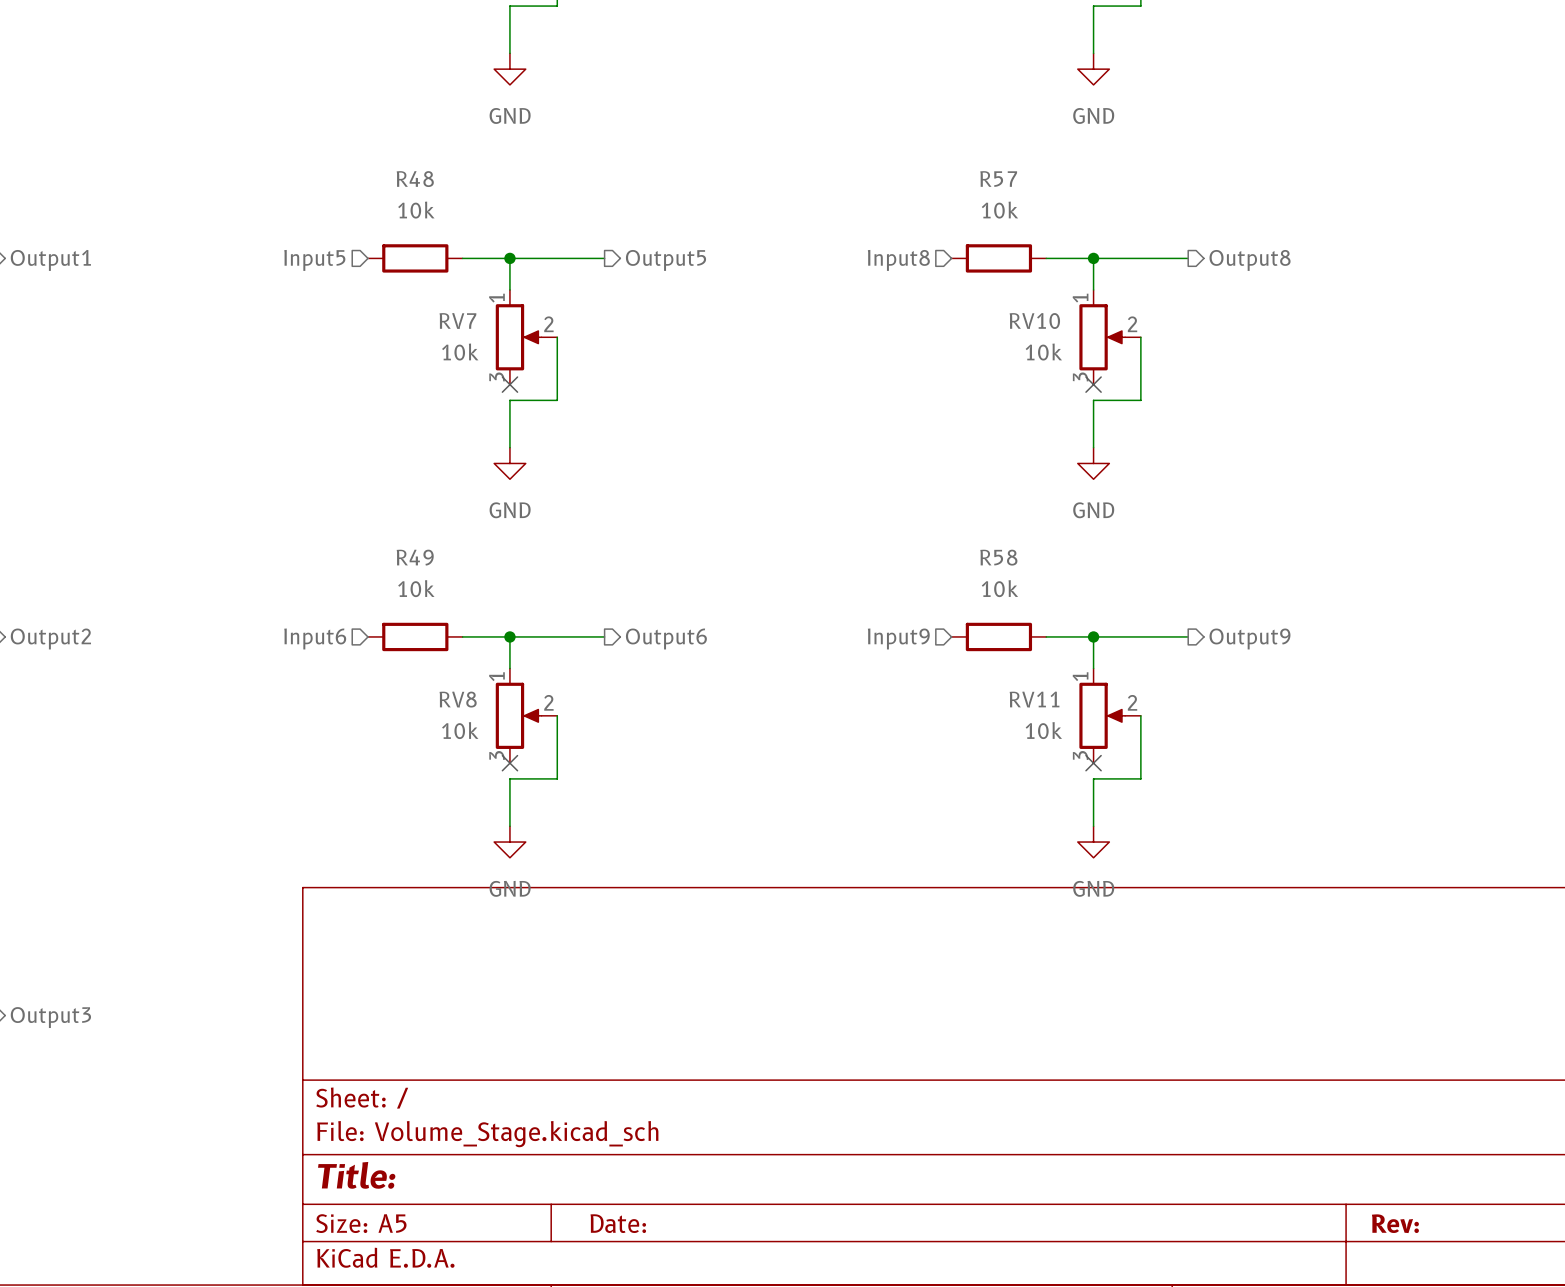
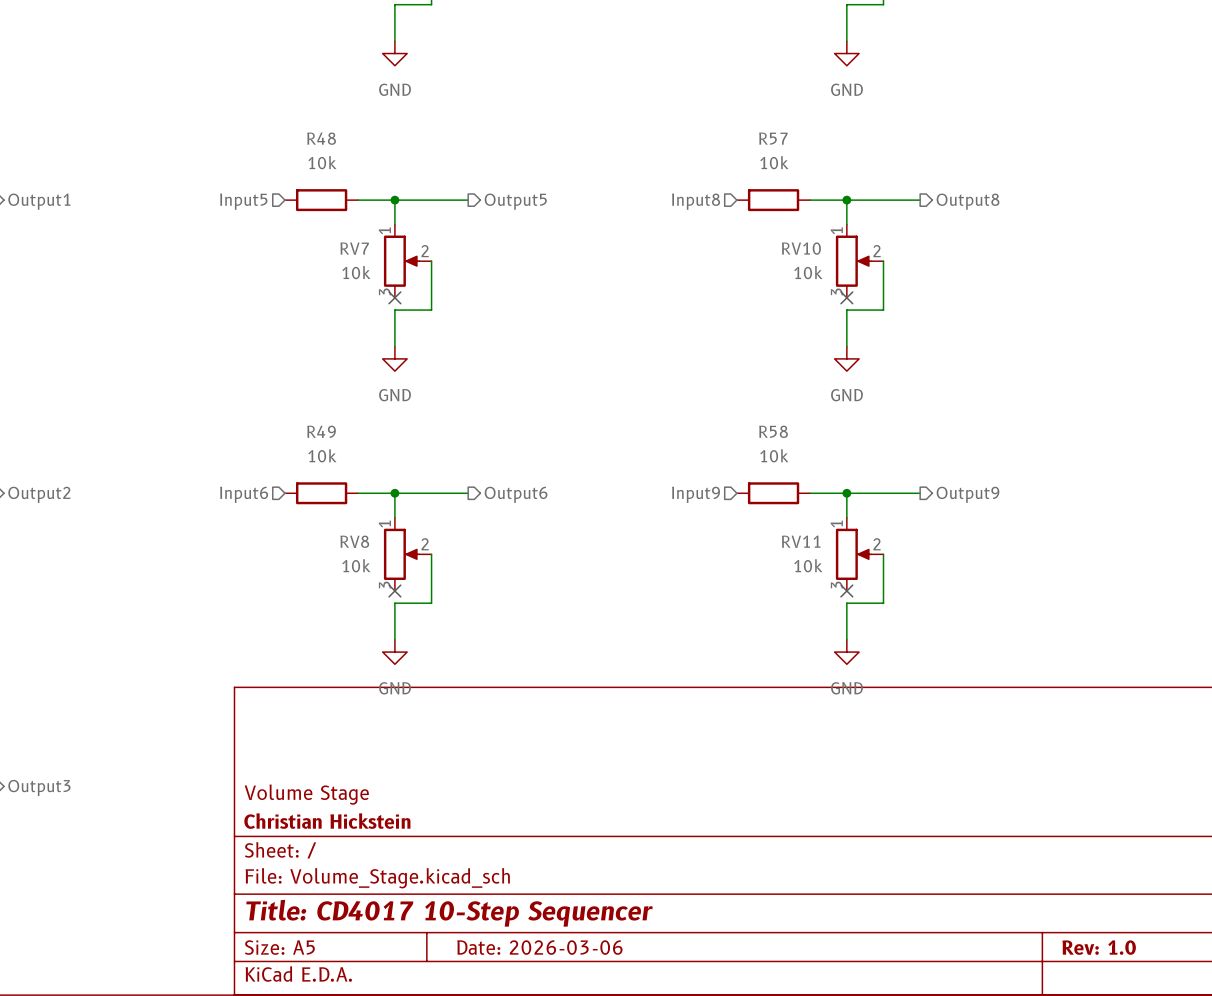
title block: none -> Volume Stage (306, 794)
title block: none -> Christian Hickstein (327, 821)
title block: Title: (356, 1175) -> Title: CD4017 10-Step Sequencer (449, 913)
title block: Date: (618, 1223) -> Date: 2026-03-06 (539, 947)
title block: Rev: (1395, 1223) -> Rev: 1.0 (1099, 947)

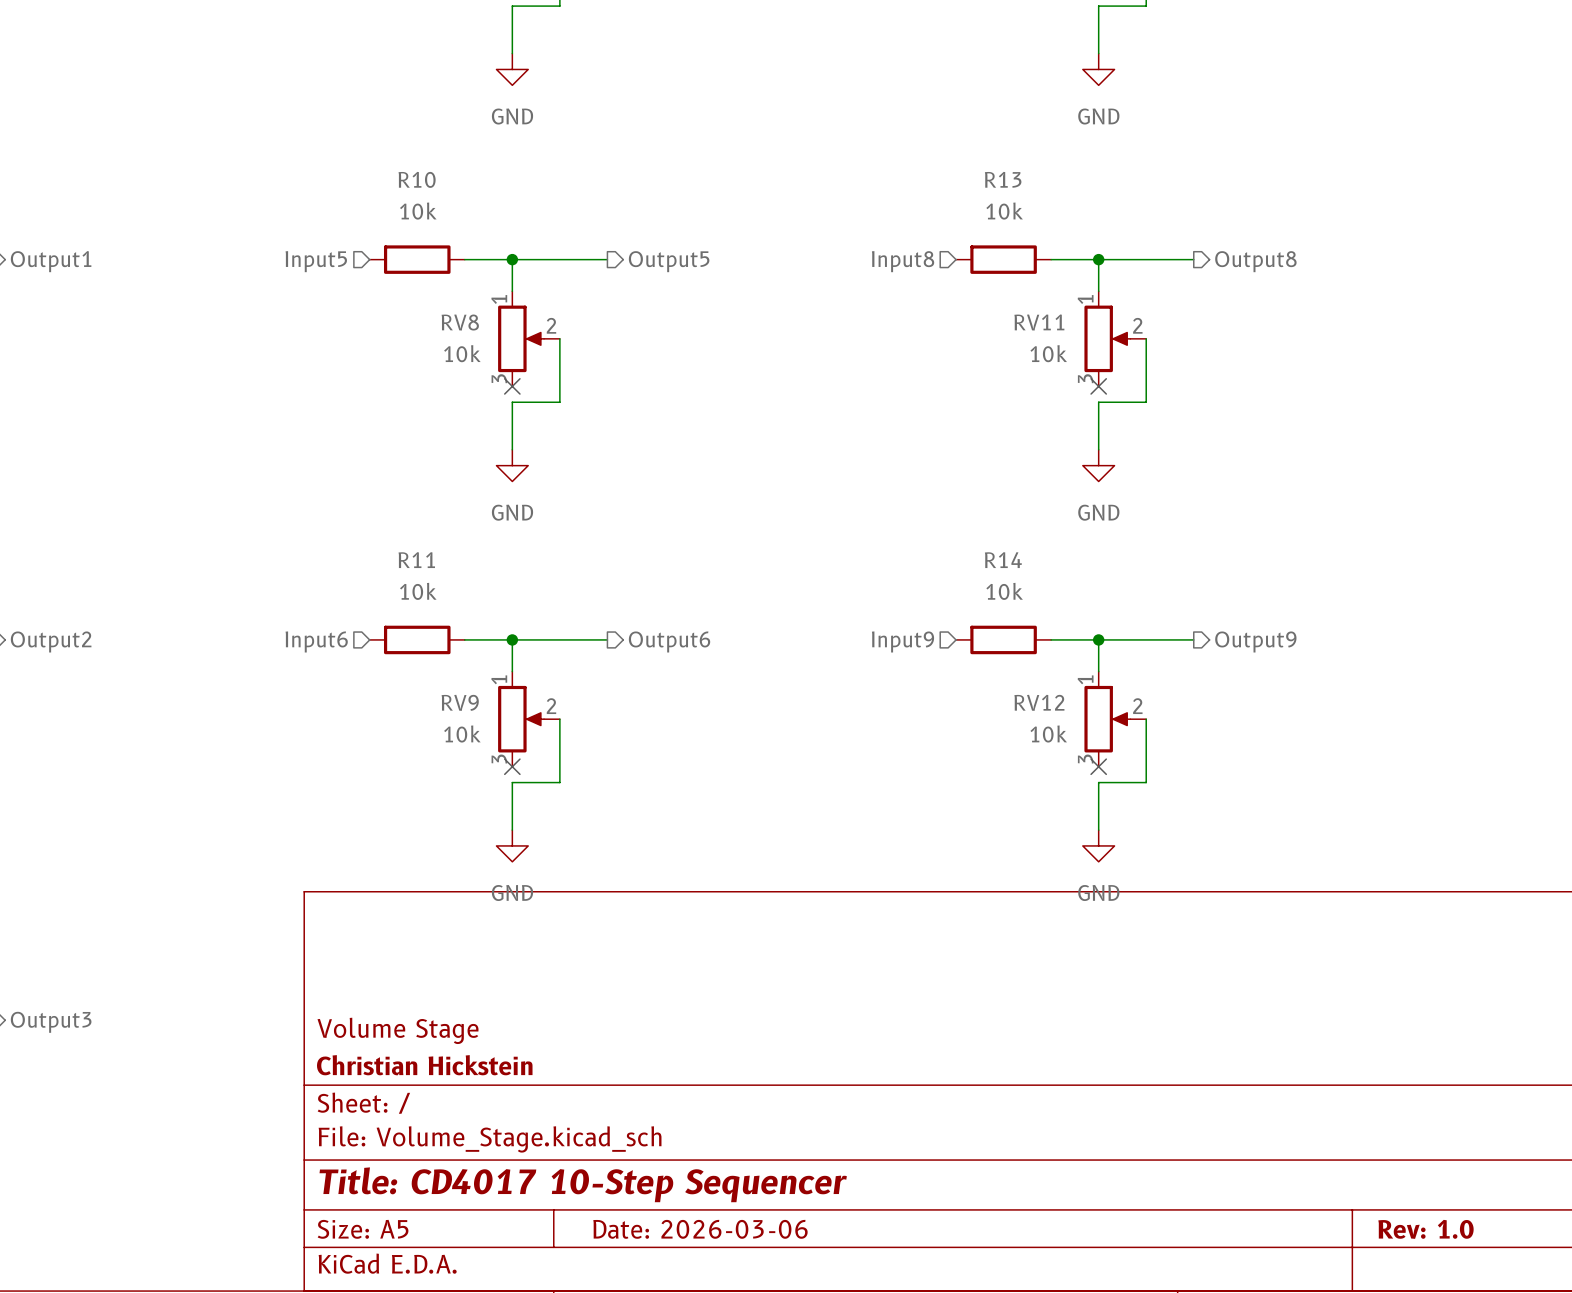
R48 name: R48 (321, 138) -> R10 (417, 179)
R57 name: R57 (773, 138) -> R13 (1003, 179)
RV7 name: RV7 (354, 248) -> RV8 (460, 322)
RV10 name: RV10 (801, 248) -> RV11 (1039, 322)
R49 name: R49 (321, 431) -> R11 (416, 560)
R58 name: R58 (773, 431) -> R14 (1003, 560)
RV8 name: RV8 (354, 541) -> RV9 (460, 702)
RV11 name: RV11 (801, 541) -> RV12 (1039, 702)

